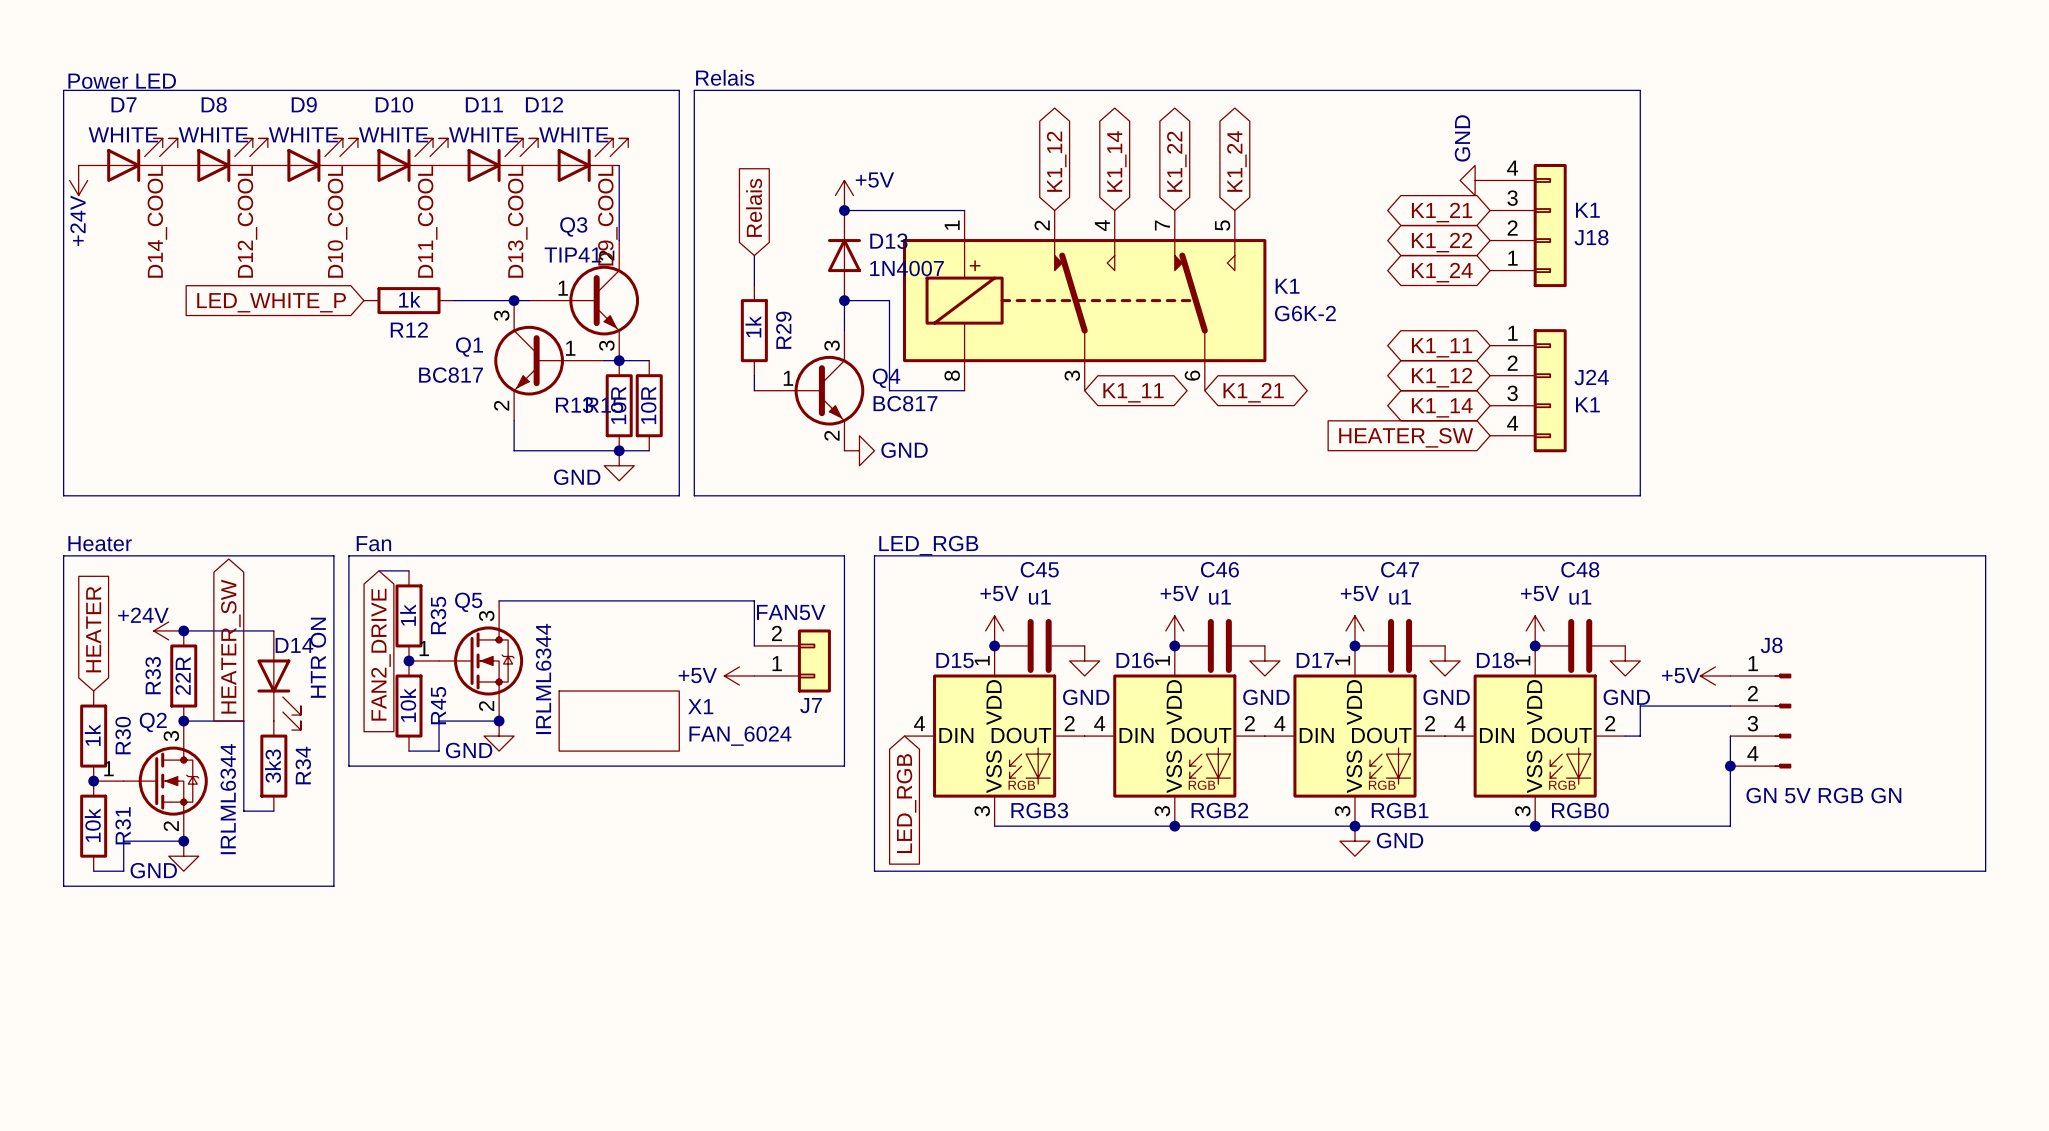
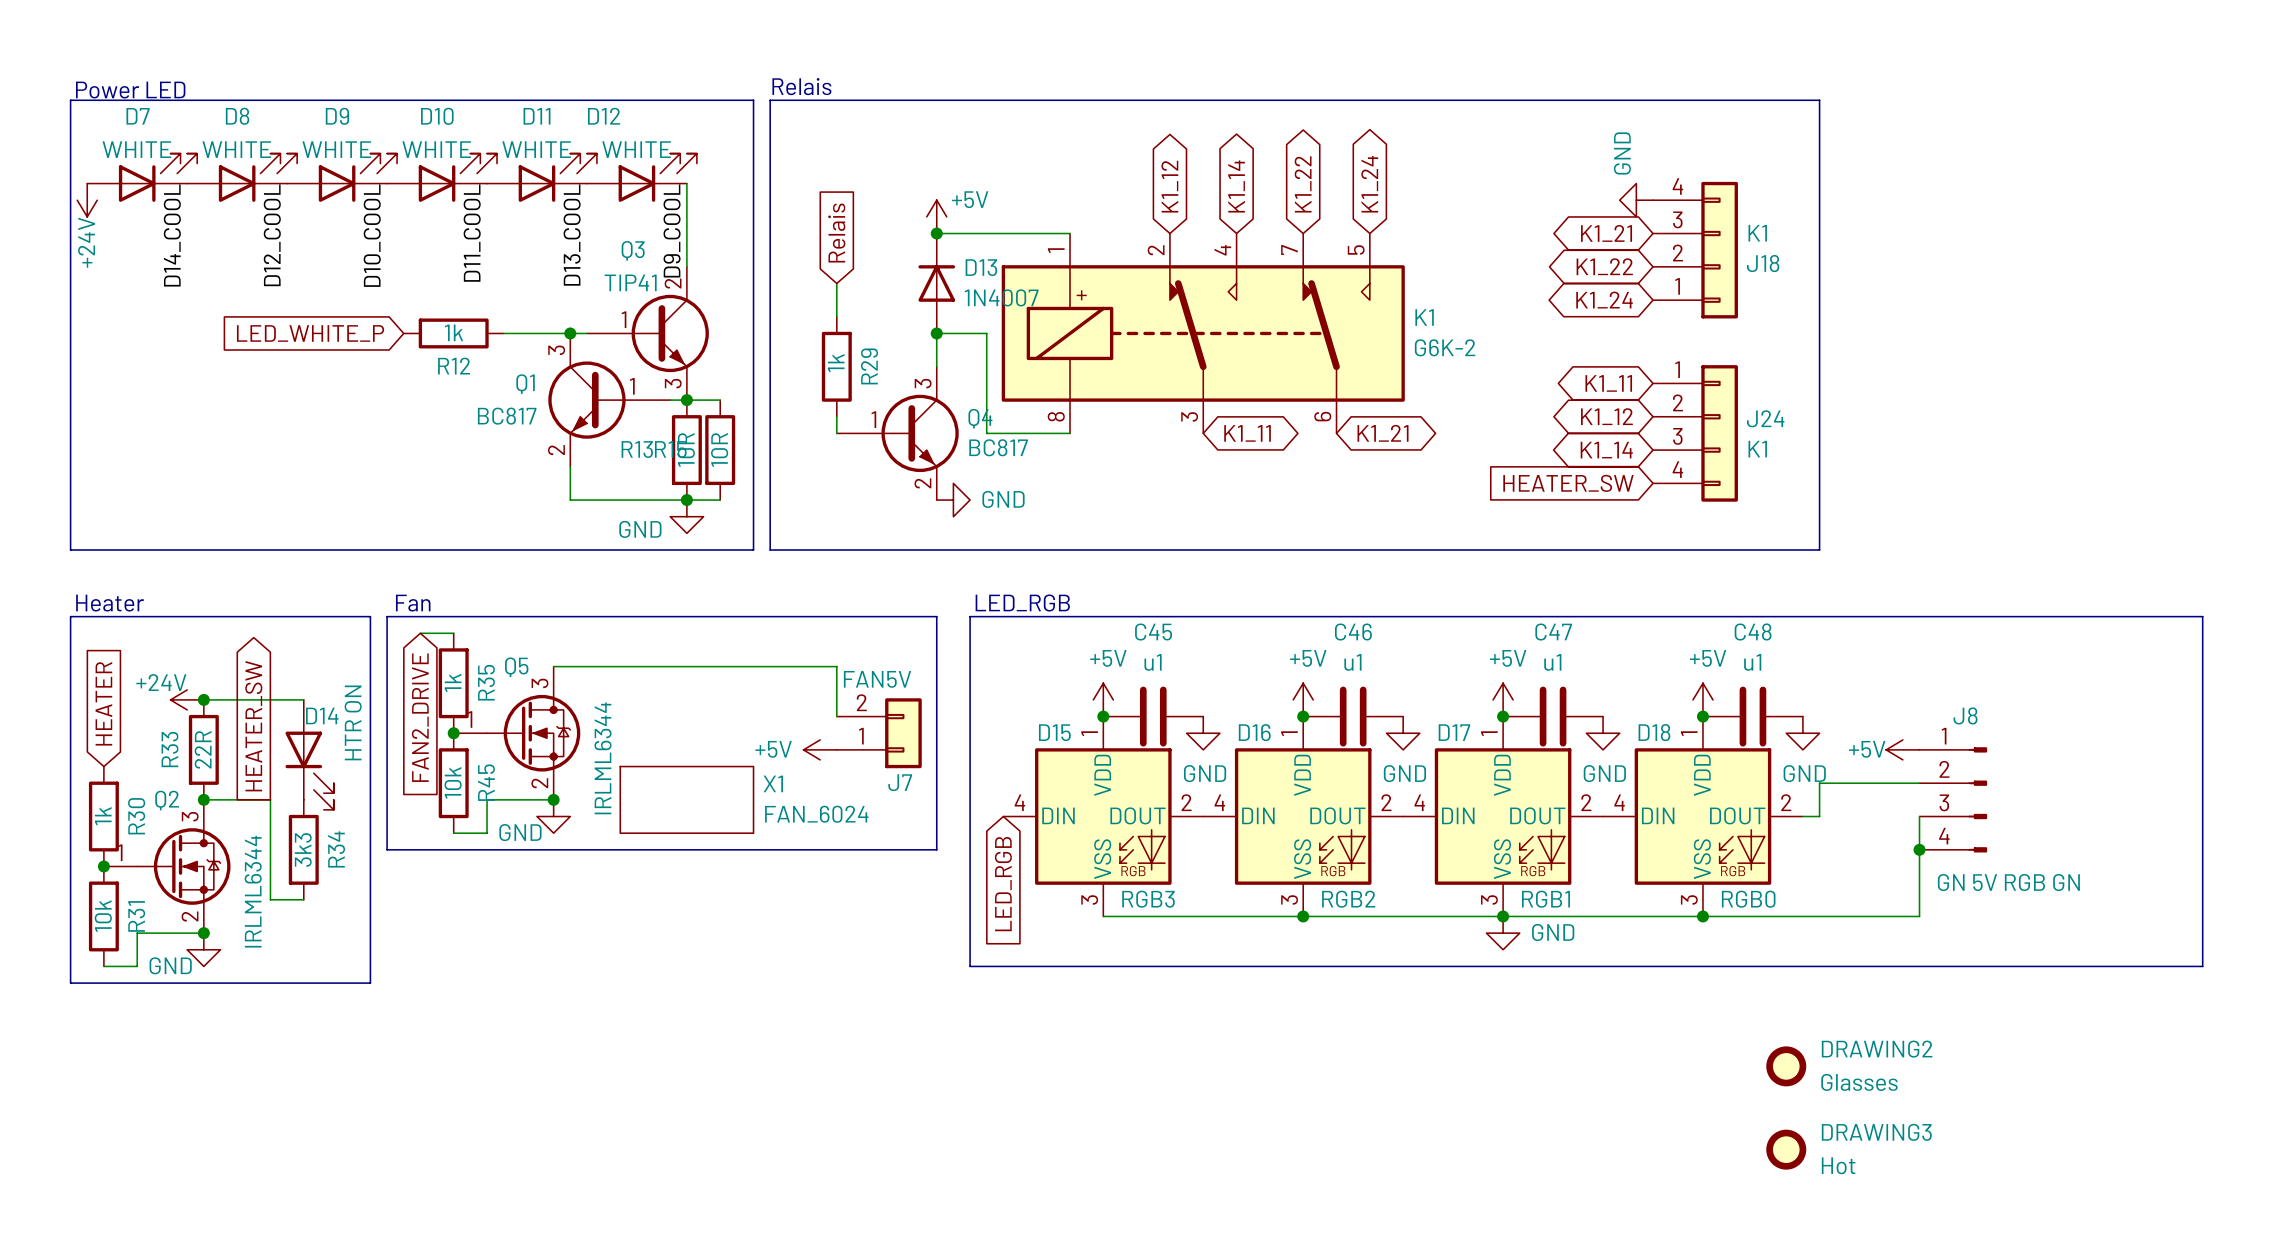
DRAWING2: none -> Glasses (1786, 1066)
DRAWING3: none -> Hot (1786, 1149)

